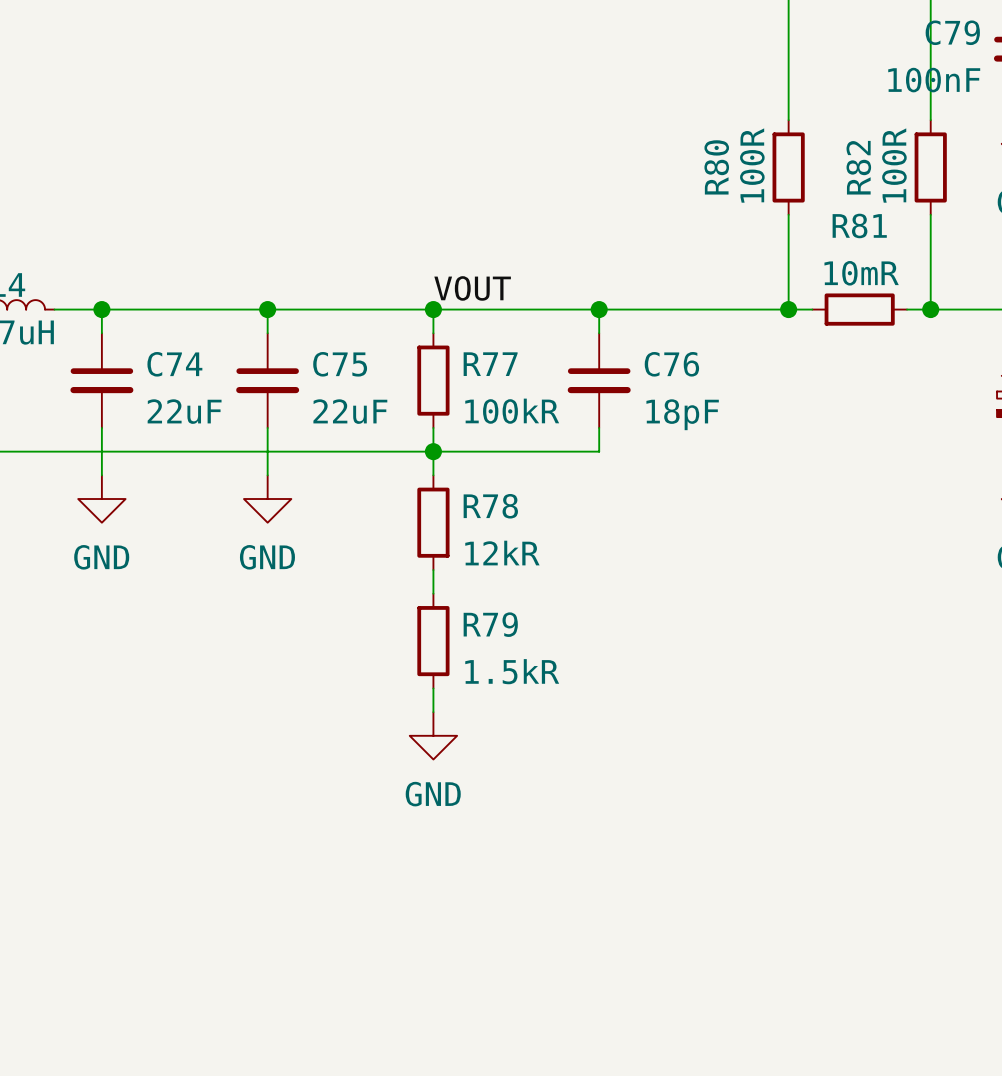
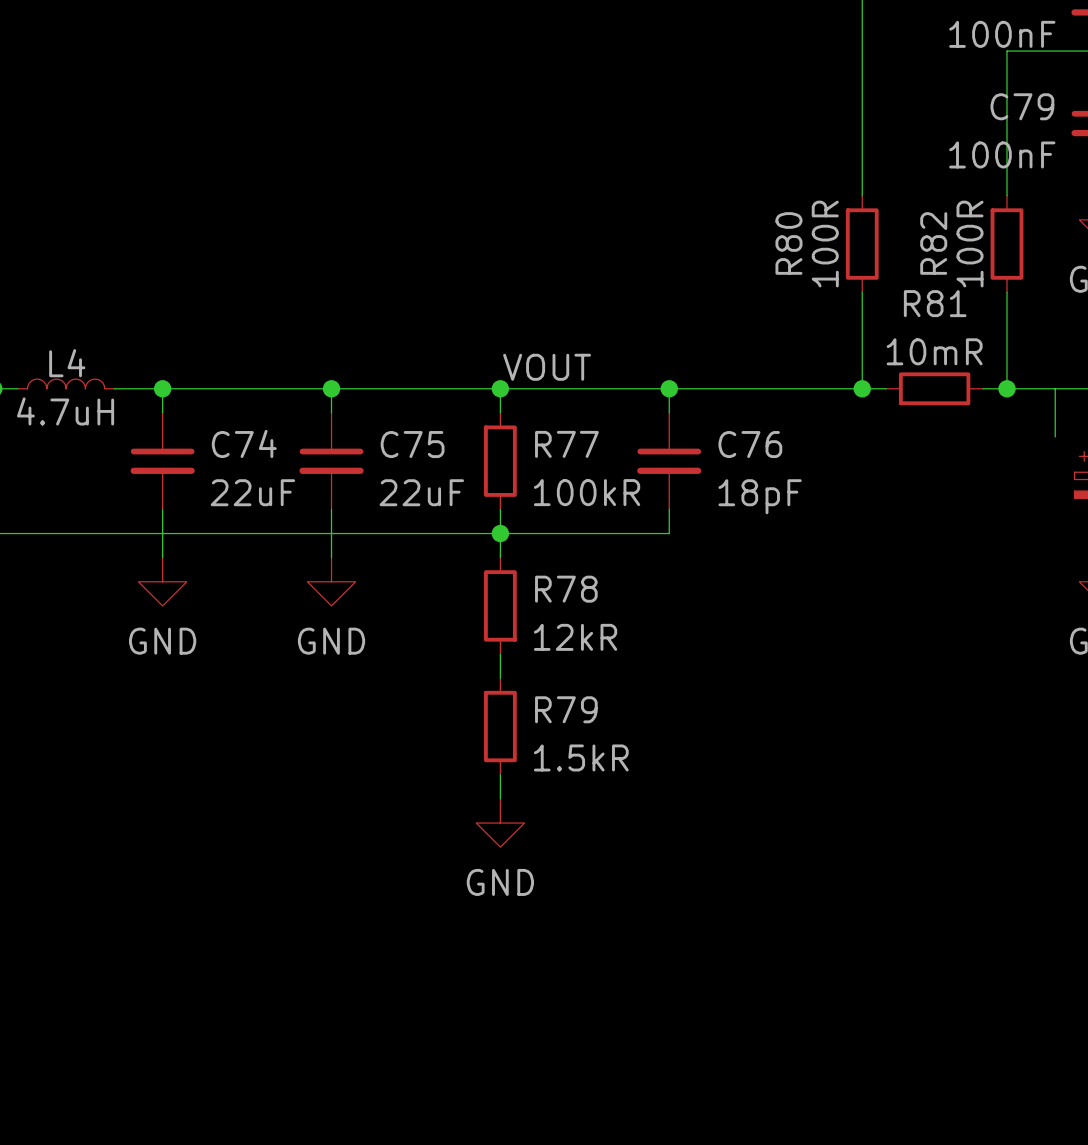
wire: none -> (1055, 388) (1055, 437)

